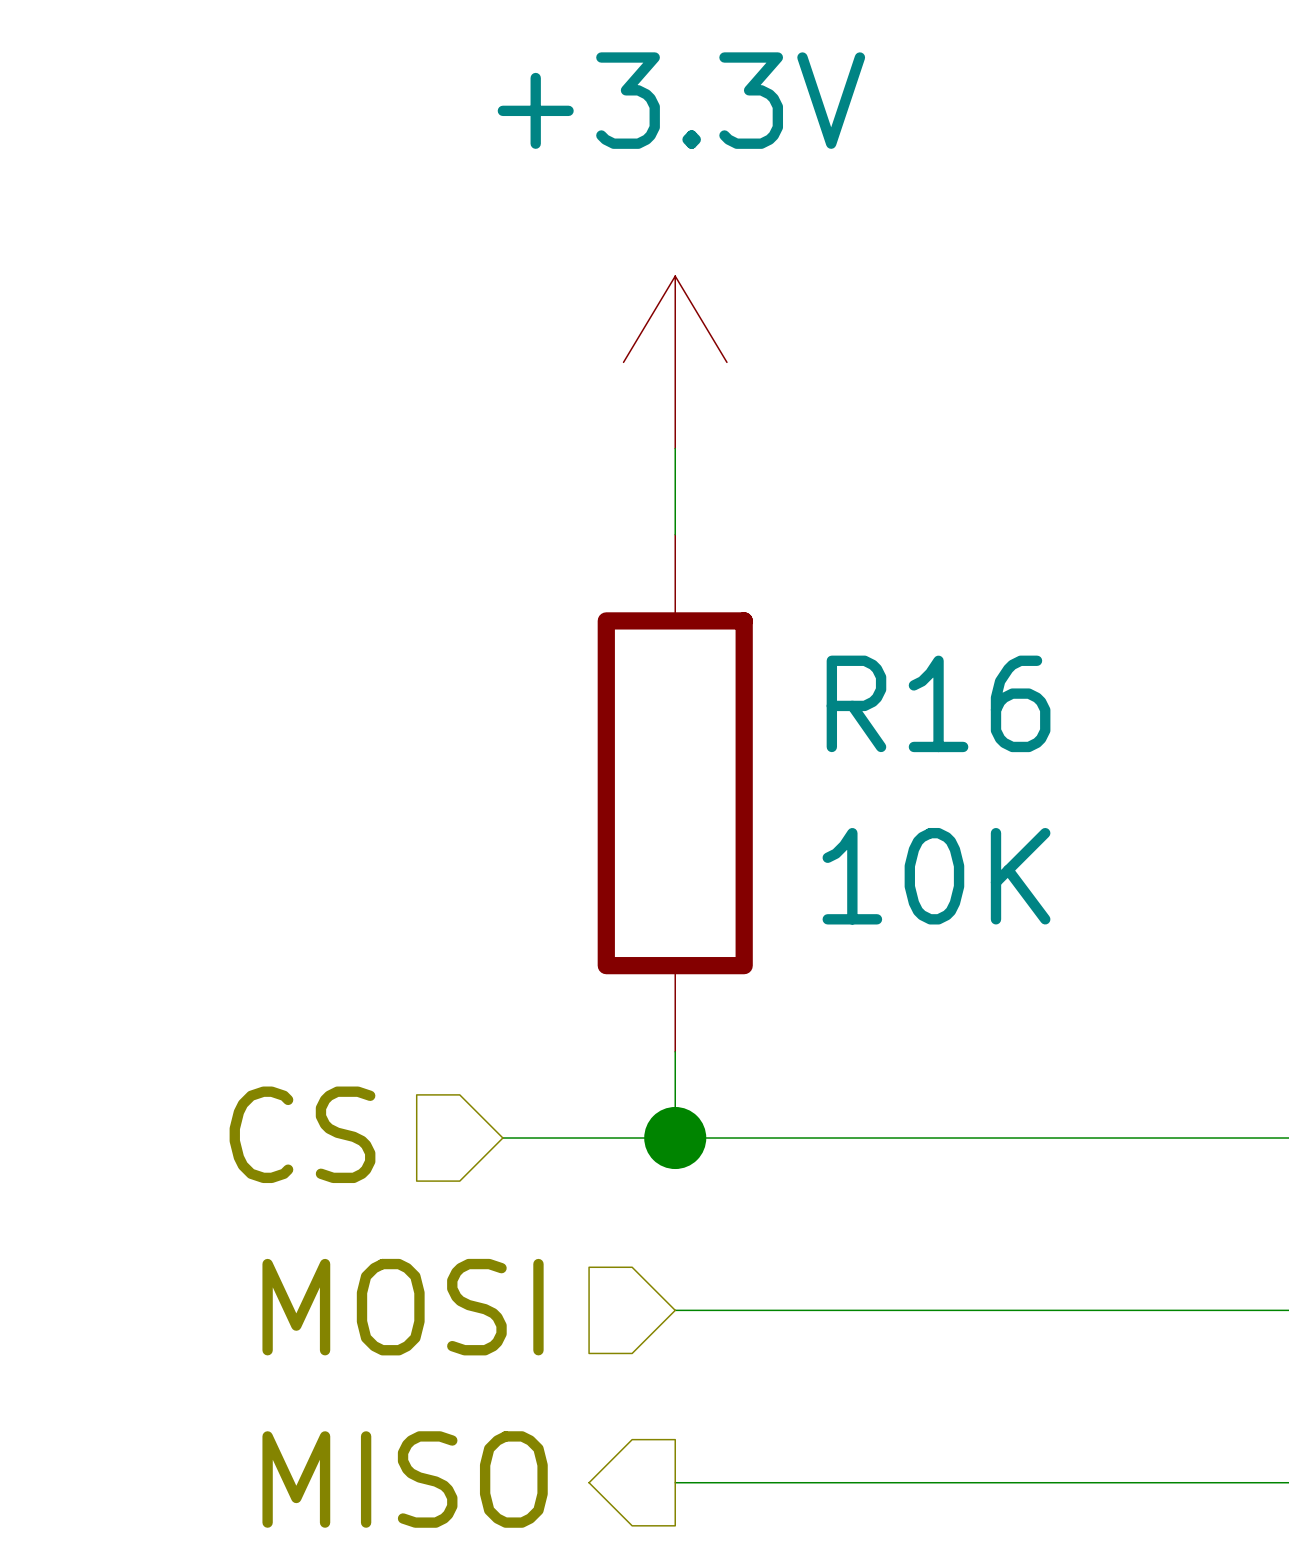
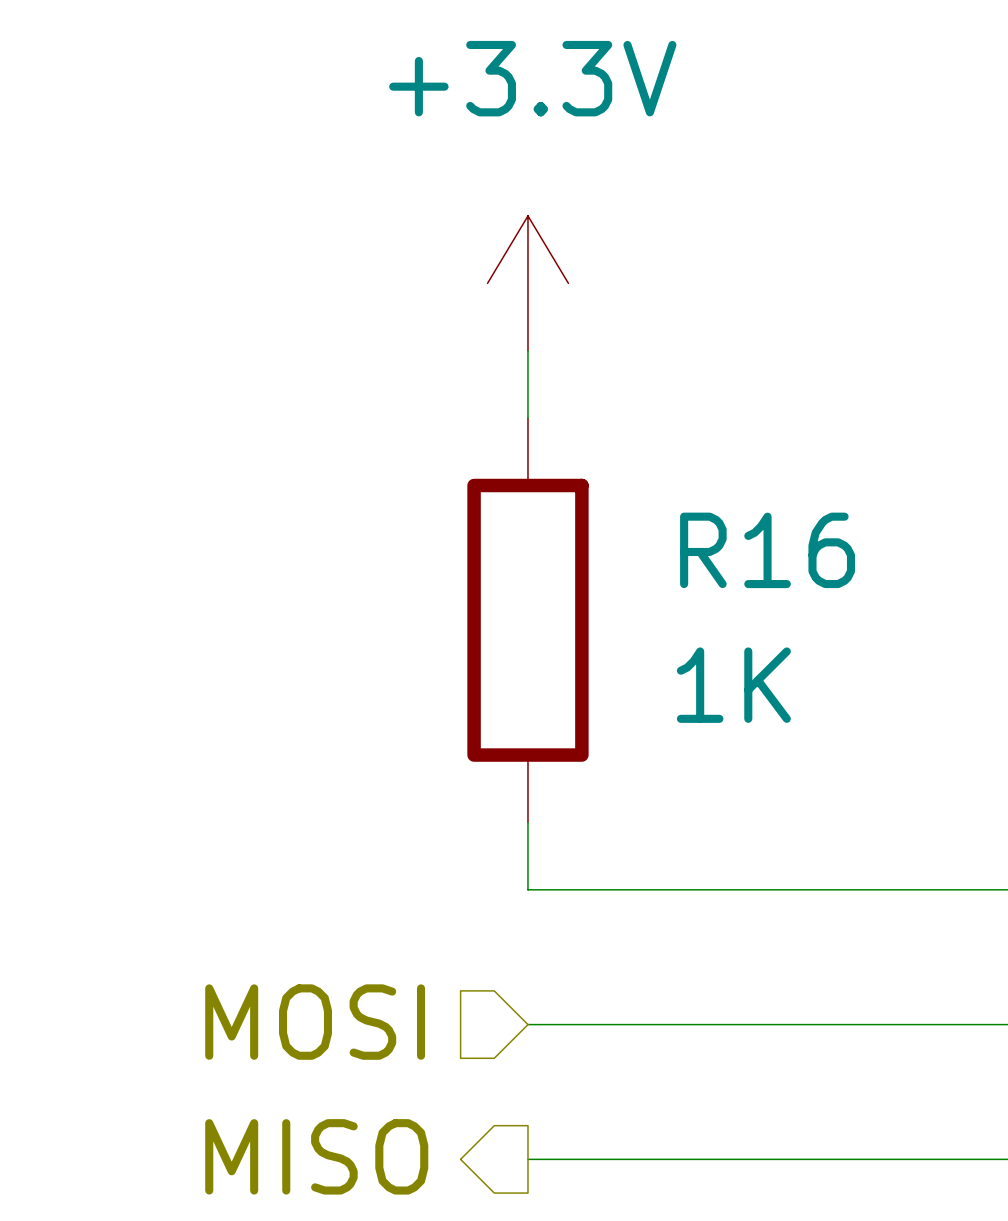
R16 name position: R16 (938, 703) -> R16 (767, 550)
R16 value: 10K (936, 876) -> 1K (733, 685)
hierarchical label: CS (302, 1134) -> none
wire: (502, 1138) (675, 1138) -> none
junction: (675, 1138) -> none

